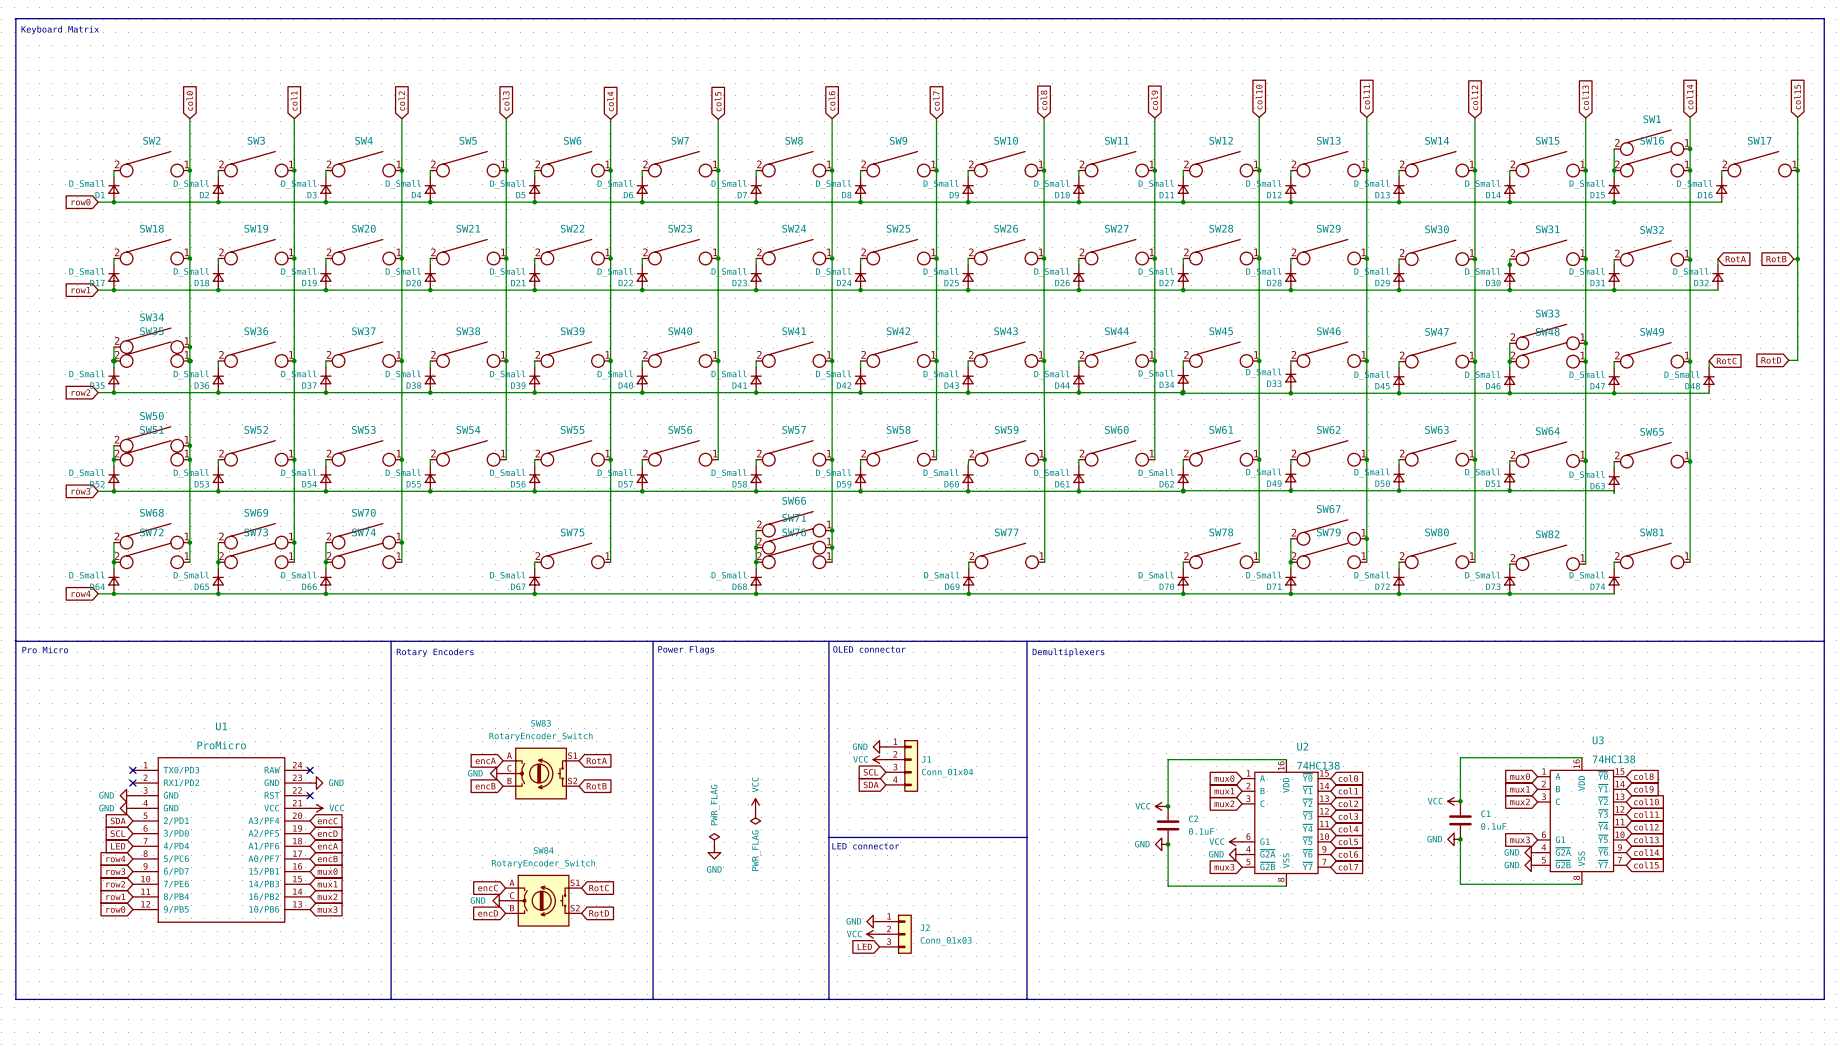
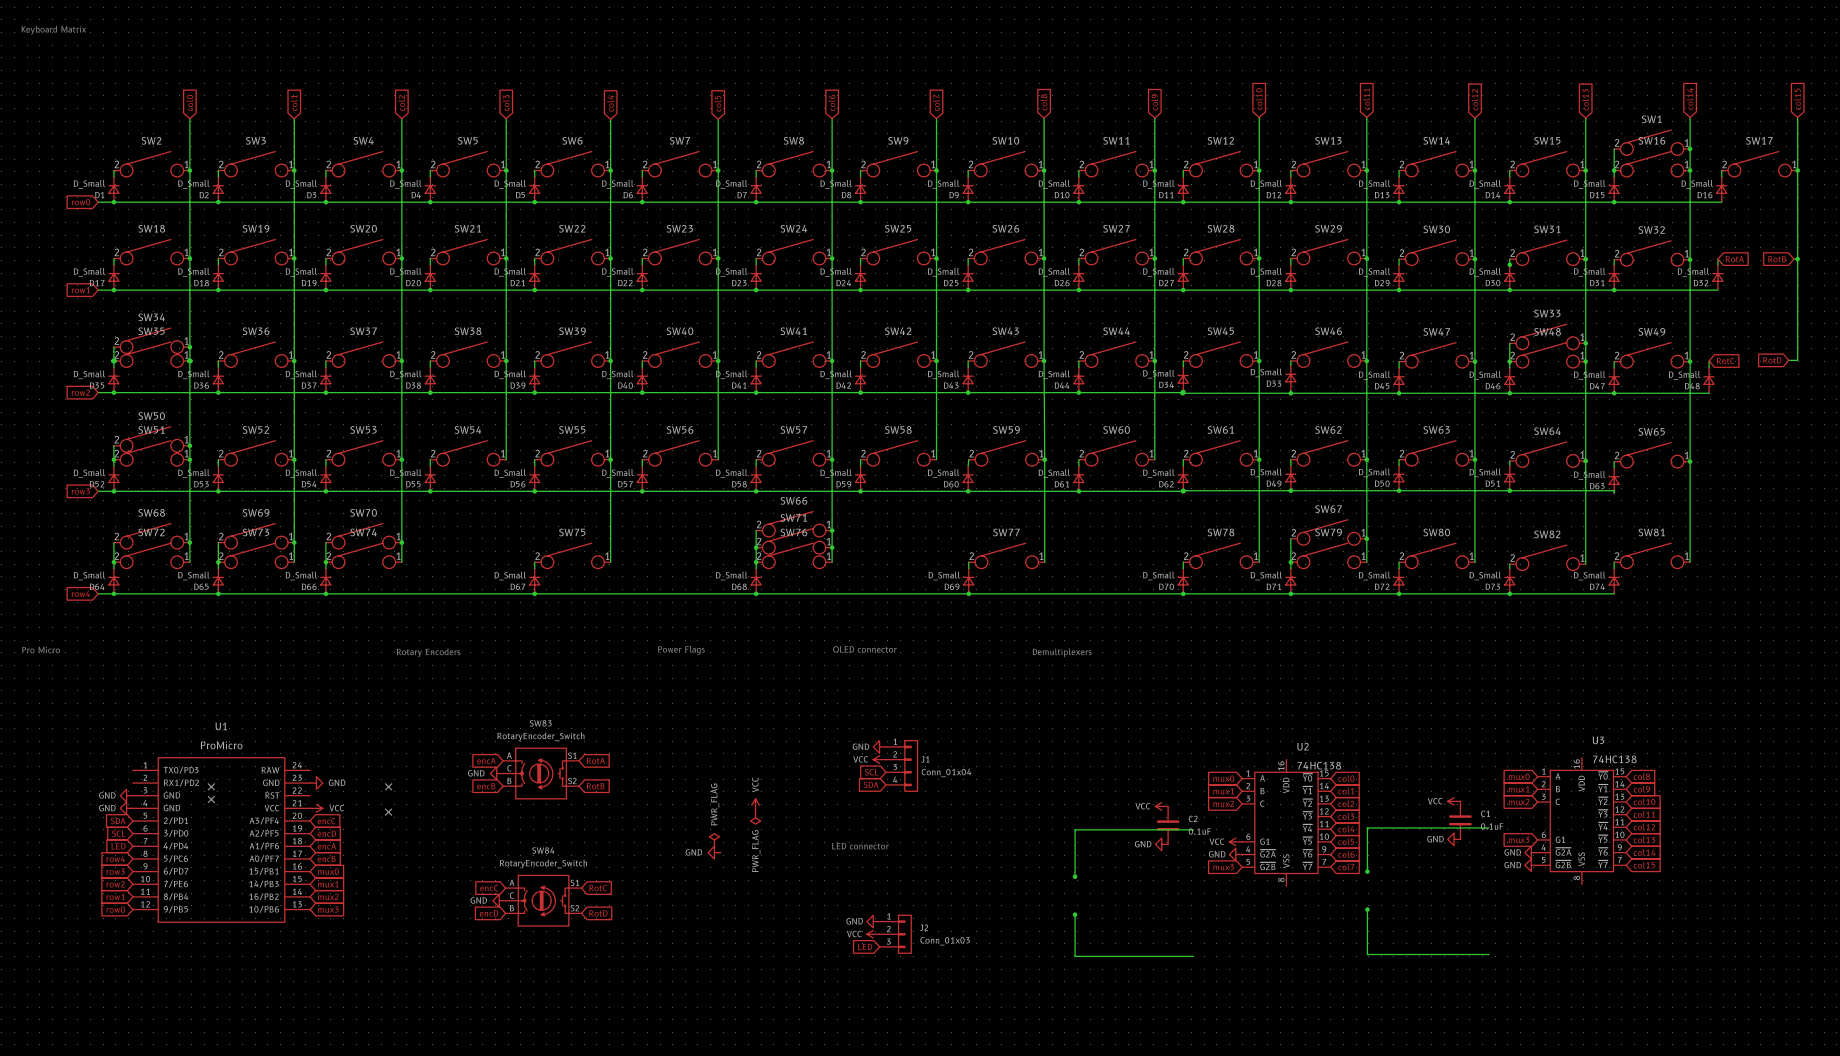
line: (15, 18) (15, 999) (1824, 999) (1824, 18) (15, 18) -> none
line: (15, 641) (1824, 641) -> none
line: (391, 641) (391, 999) -> none
line: (653, 641) (653, 999) -> none
line: (828, 641) (828, 999) -> none
line: (1026, 641) (1026, 999) -> none
wire: (1581, 757) (1460, 757) (1460, 801) -> (1488, 827) (1367, 827) (1367, 871)
wire: (1286, 759) (1168, 759) (1168, 806) -> (1193, 829) (1075, 829) (1075, 876)
no-connect mark: (132, 770) -> none
no-connect mark: (310, 770) -> none
no-connect mark: (132, 783) -> none
no-connect mark: none -> (211, 786)
no-connect mark: none -> (388, 786)
no-connect mark: (310, 795) -> none
no-connect mark: none -> (211, 799)
junction: (1460, 801) -> none
junction: (1168, 806) -> none
no-connect mark: none -> (388, 812)
line: (828, 837) (1026, 837) -> none
wire: (1460, 839) (1460, 884) (1581, 884) -> (1367, 909) (1367, 954) (1488, 954)
junction: (1460, 839) -> none
wire: (1168, 844) (1168, 886) (1286, 886) -> (1075, 914) (1075, 956) (1193, 956)
junction: (1168, 844) -> none
power symbol rotation: 0° (714, 852) -> 90° clockwise (714, 852)
junction: none -> (1367, 871)
junction: none -> (1075, 876)
junction: none -> (1367, 909)
junction: none -> (1075, 914)

